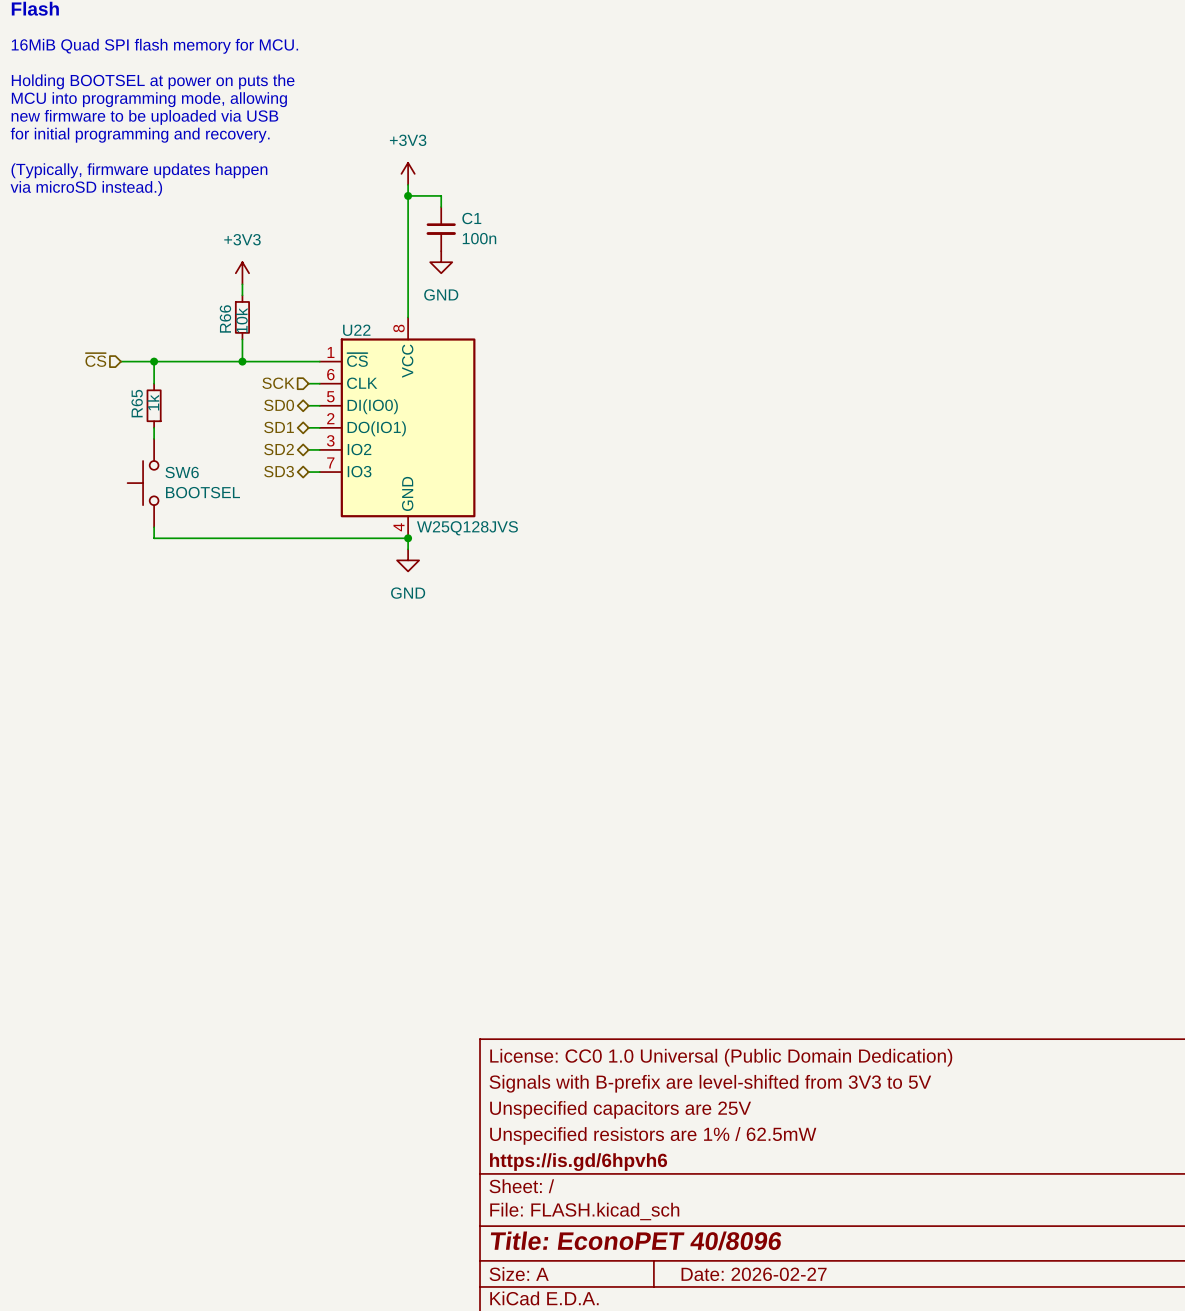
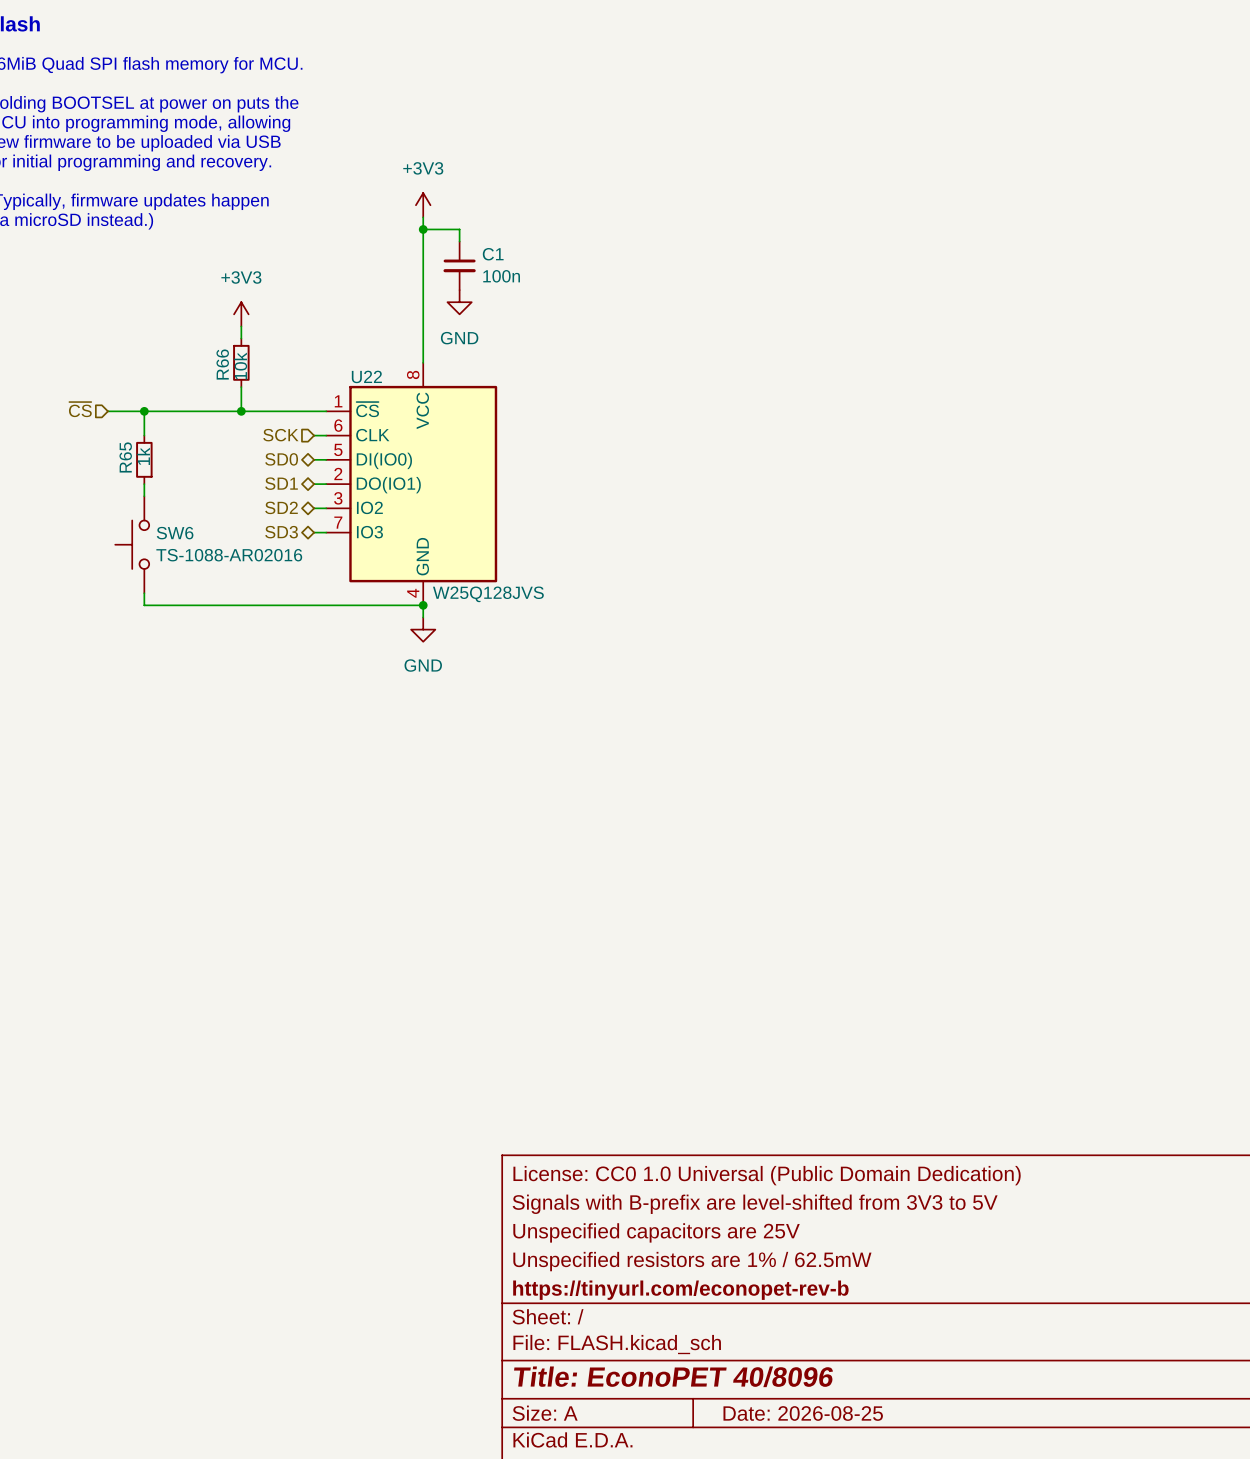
SW6 value: BOOTSEL (203, 492) -> TS-1088-AR02016 (229, 555)
title block: https://is.gd/6hpvh6 (578, 1162) -> https://tinyurl.com/econopet-rev-b (680, 1290)
title block: Date: 2026-02-27 (754, 1274) -> Date: 2026-08-25 (803, 1413)

